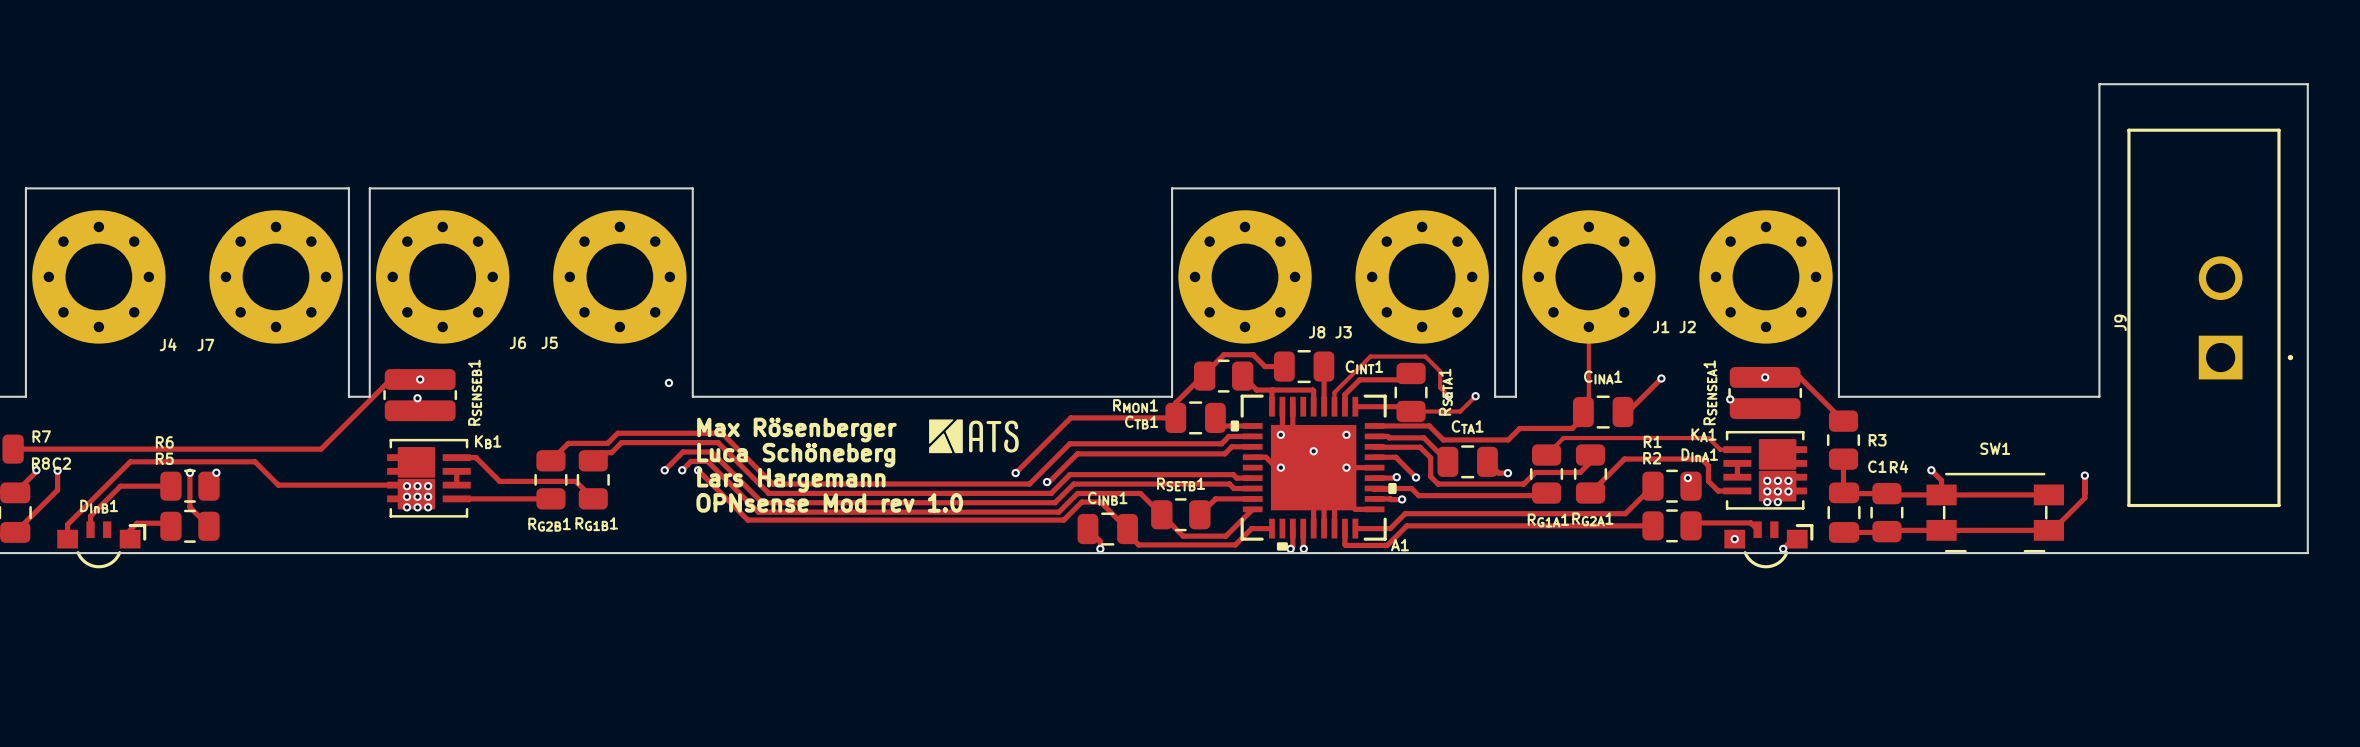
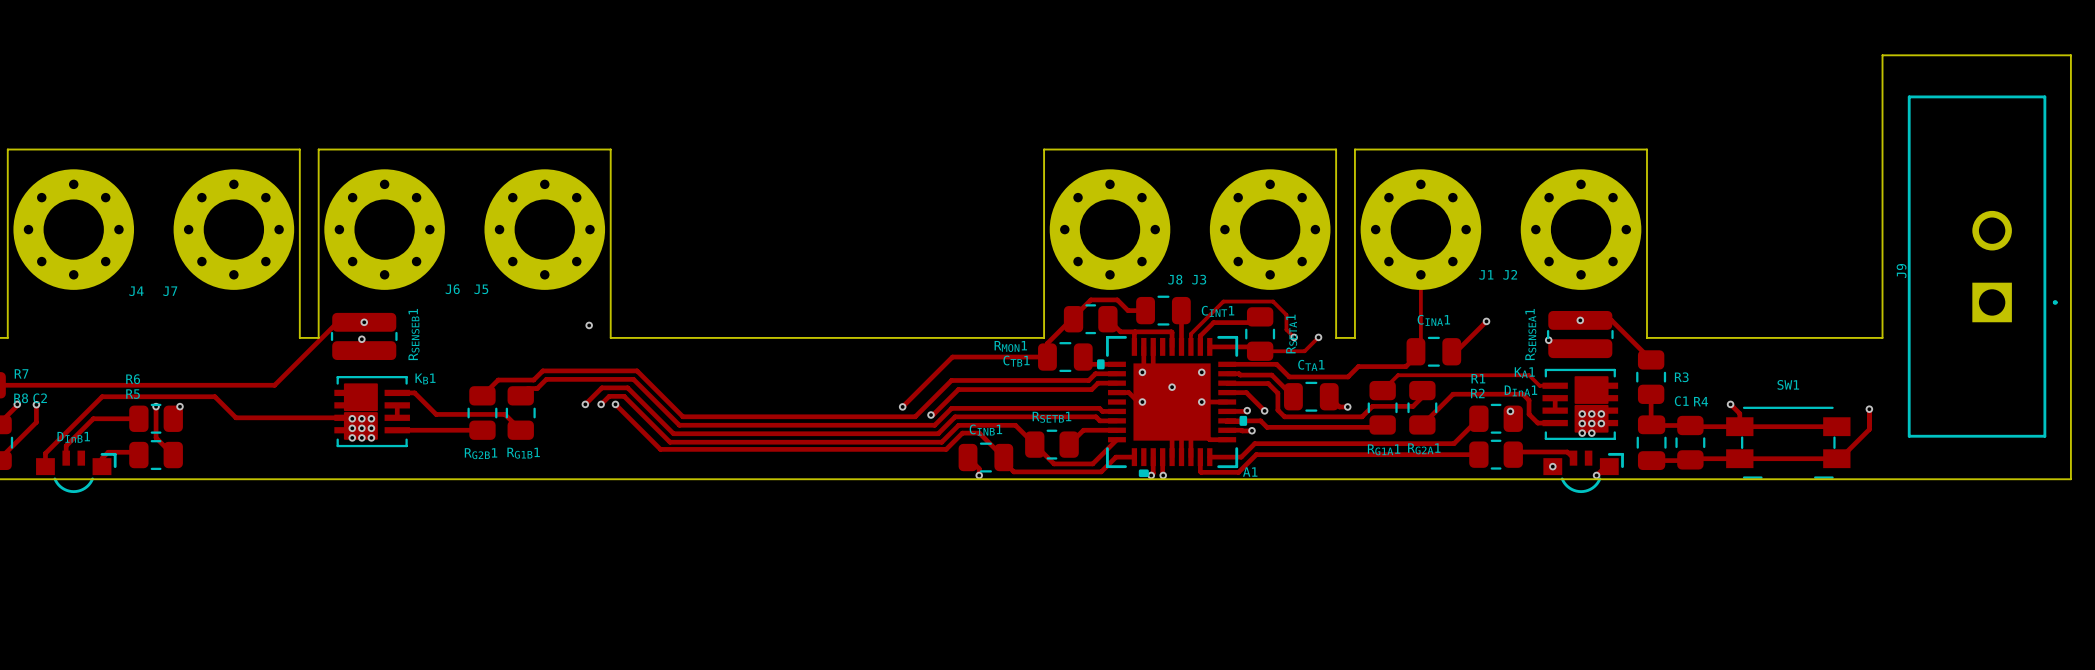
drawing: [929, 419, 1019, 454] -> none
text: Max Rösenberger (796, 430) -> none
text: Luca Schöneberg (796, 455) -> none
text: Lars Hargemann (791, 480) -> none
text: OPNsense Mod rev 1.0 (829, 502) -> none

